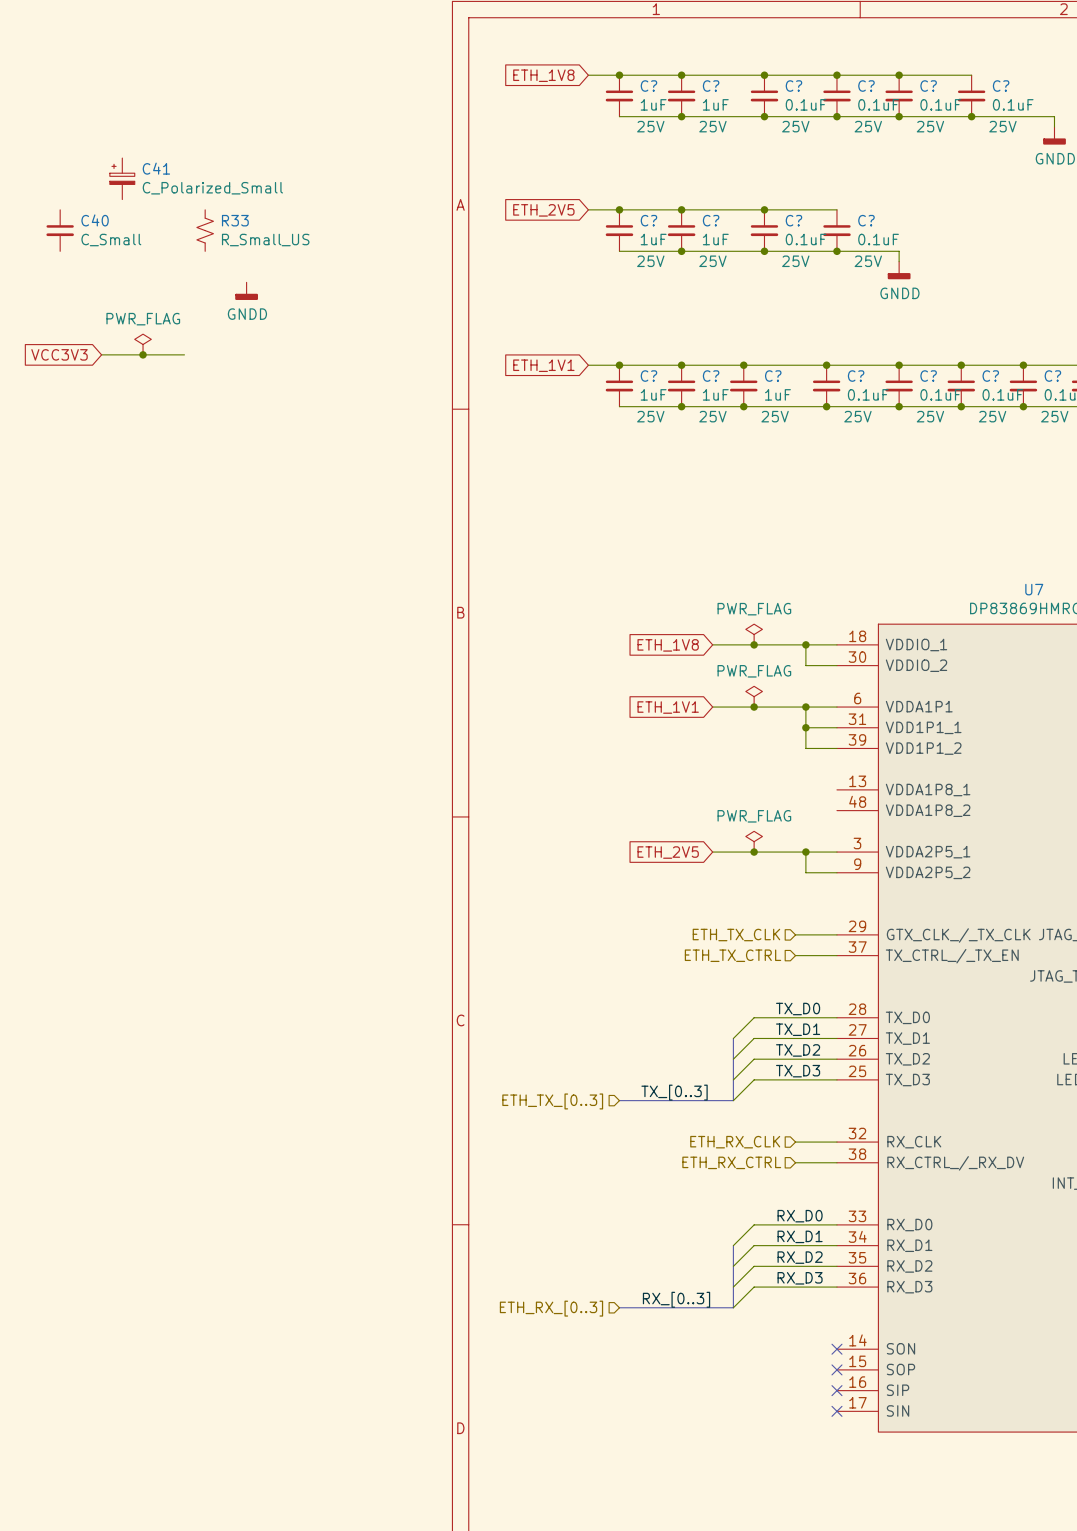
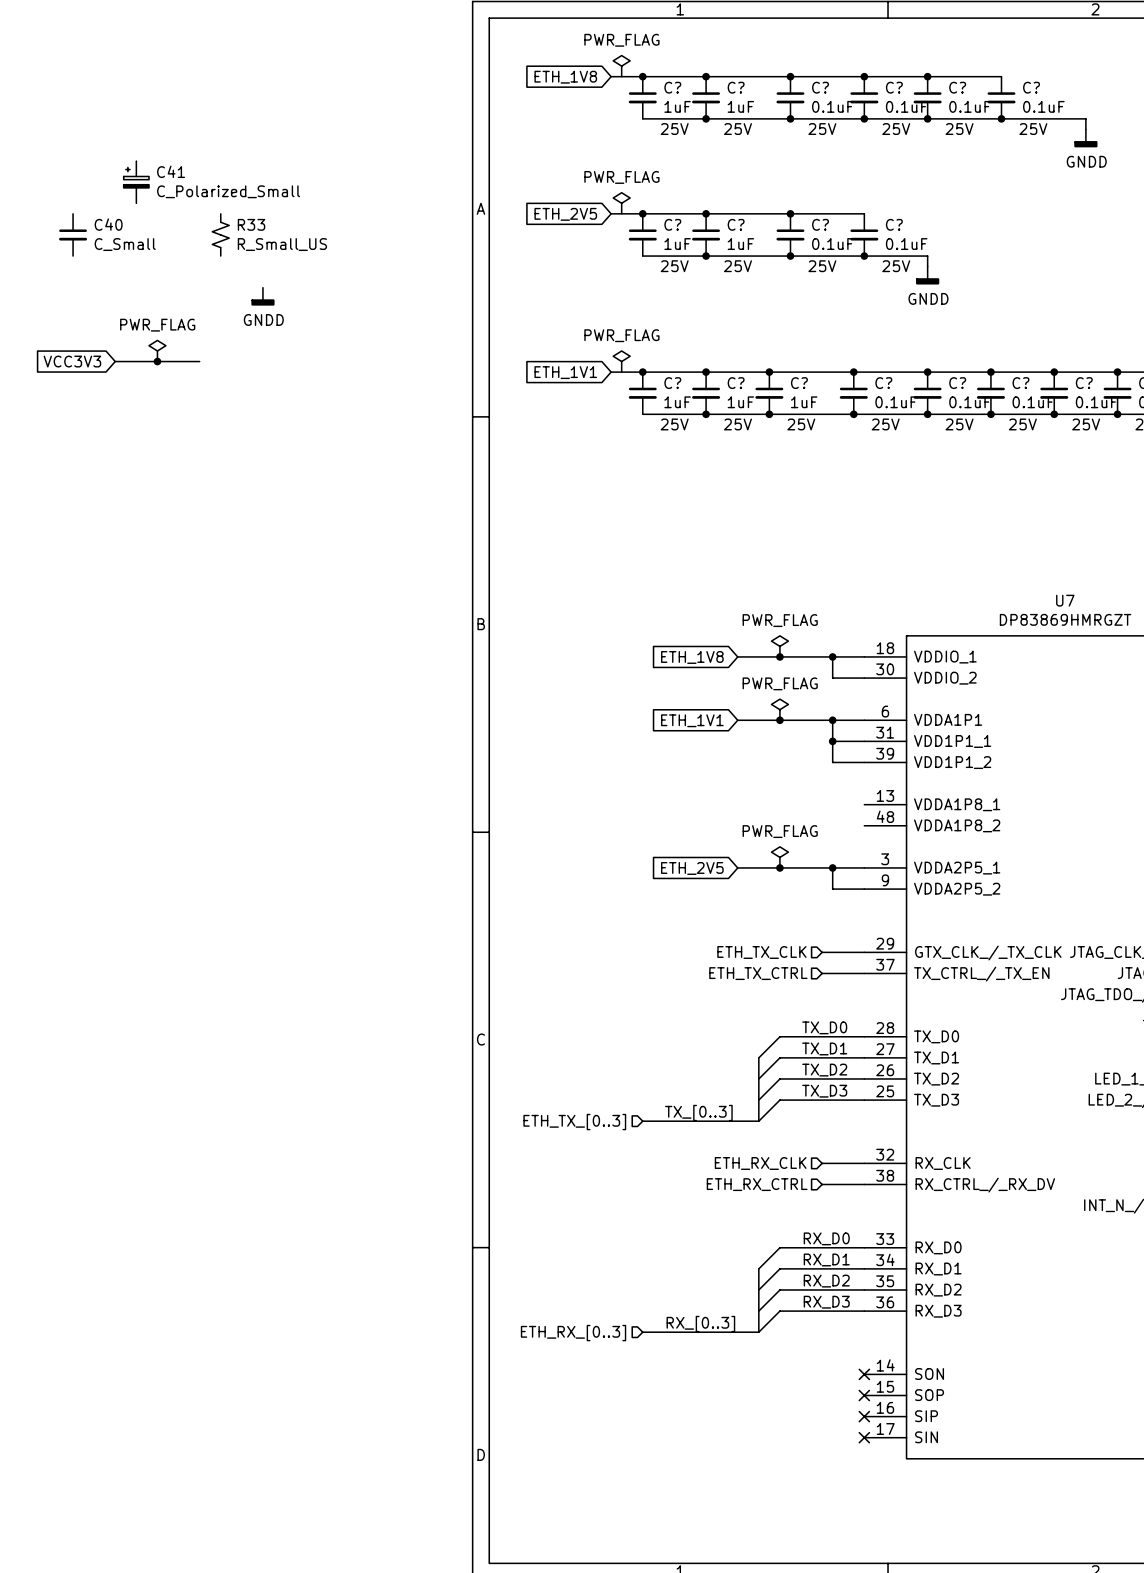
power symbol: none -> PWR_FLAG (621, 66)
power symbol: none -> PWR_FLAG (621, 203)
power symbol: none -> PWR_FLAG (621, 361)

